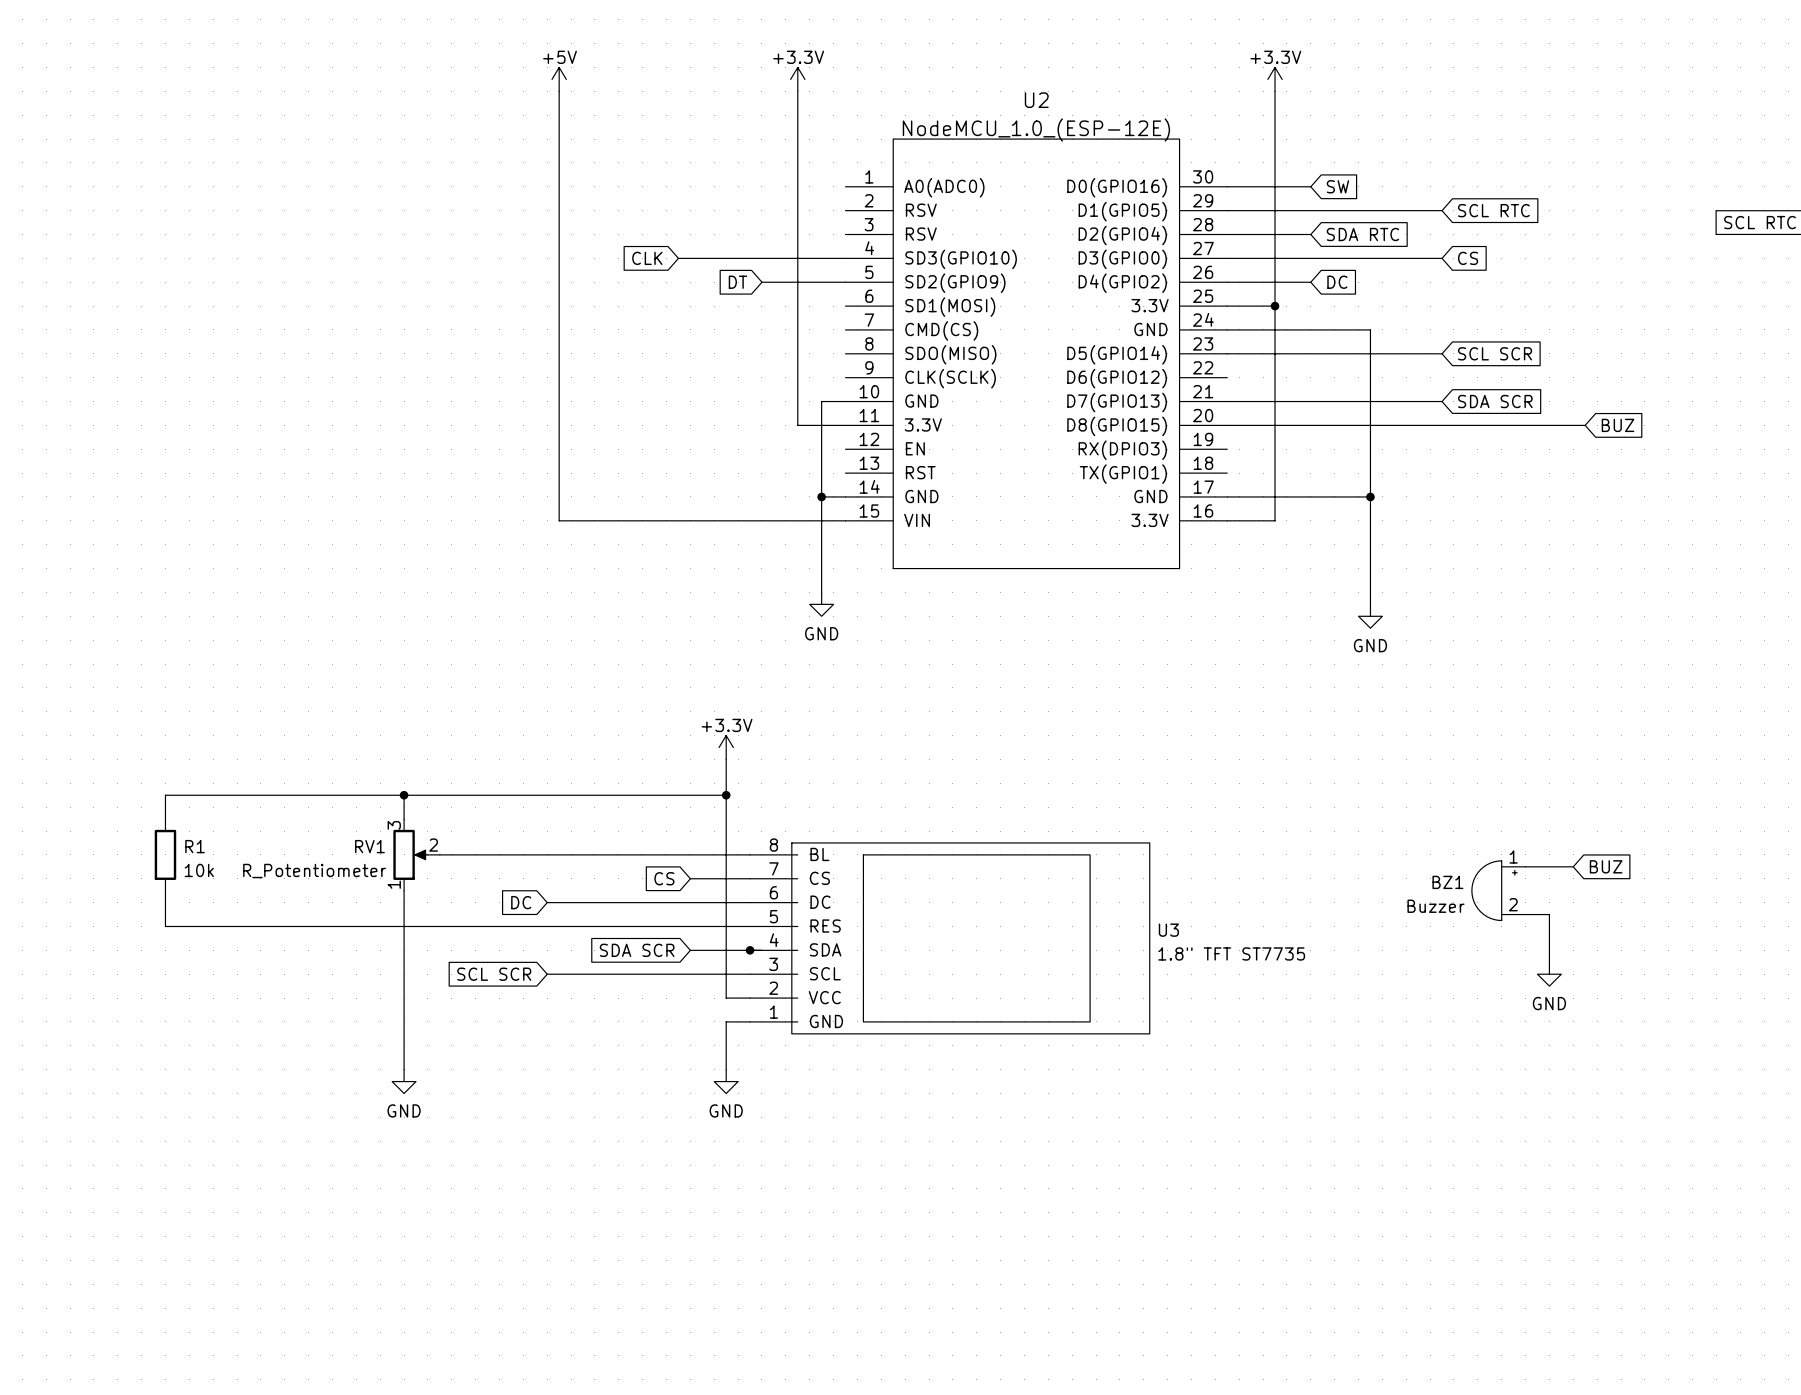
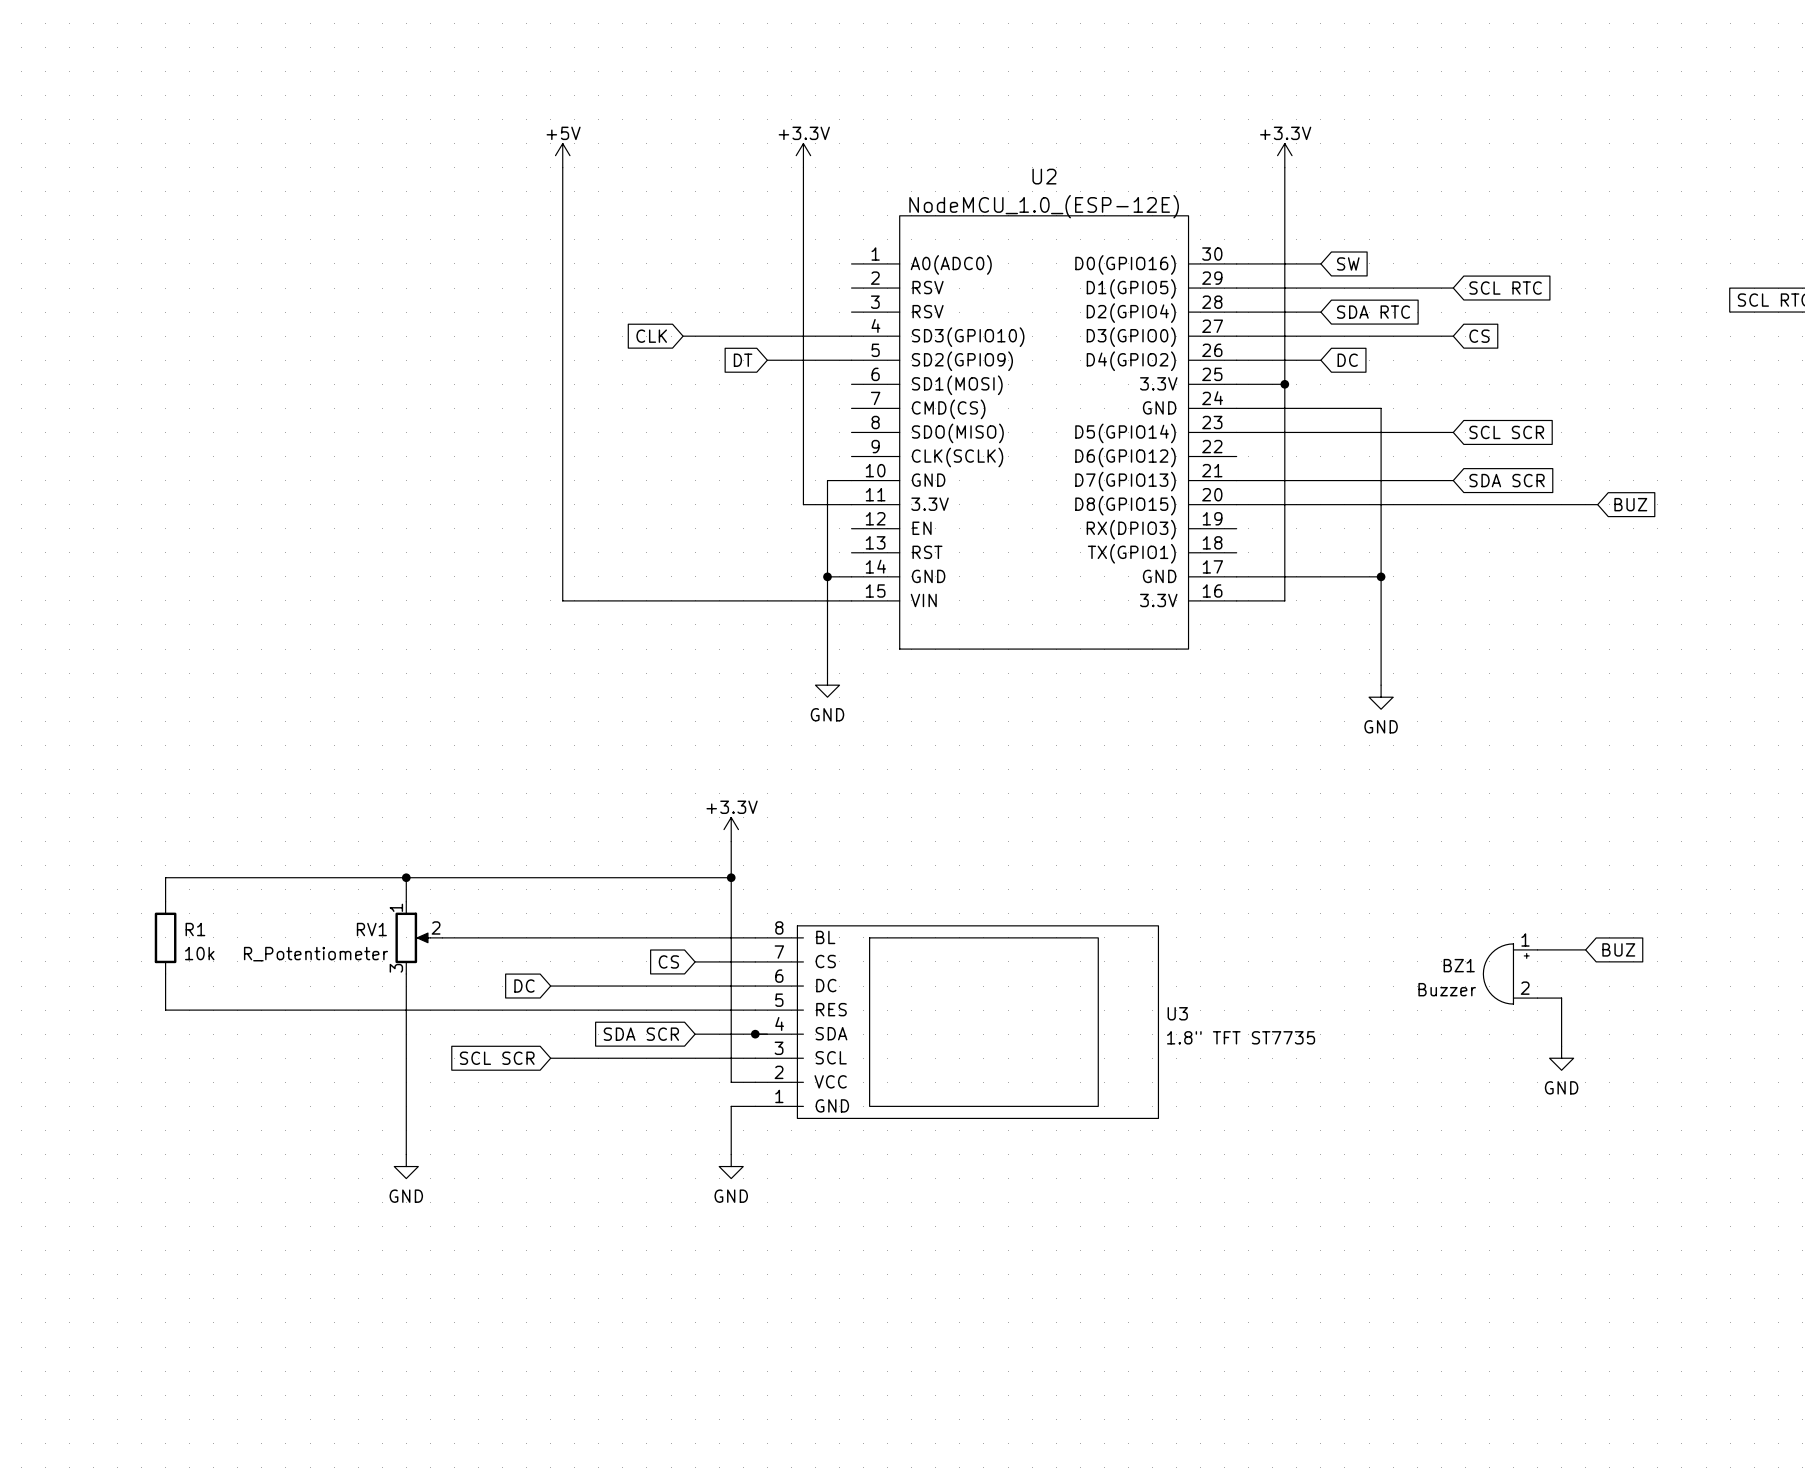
RV1 flip: as is (410, 854) -> up-down (412, 937)

